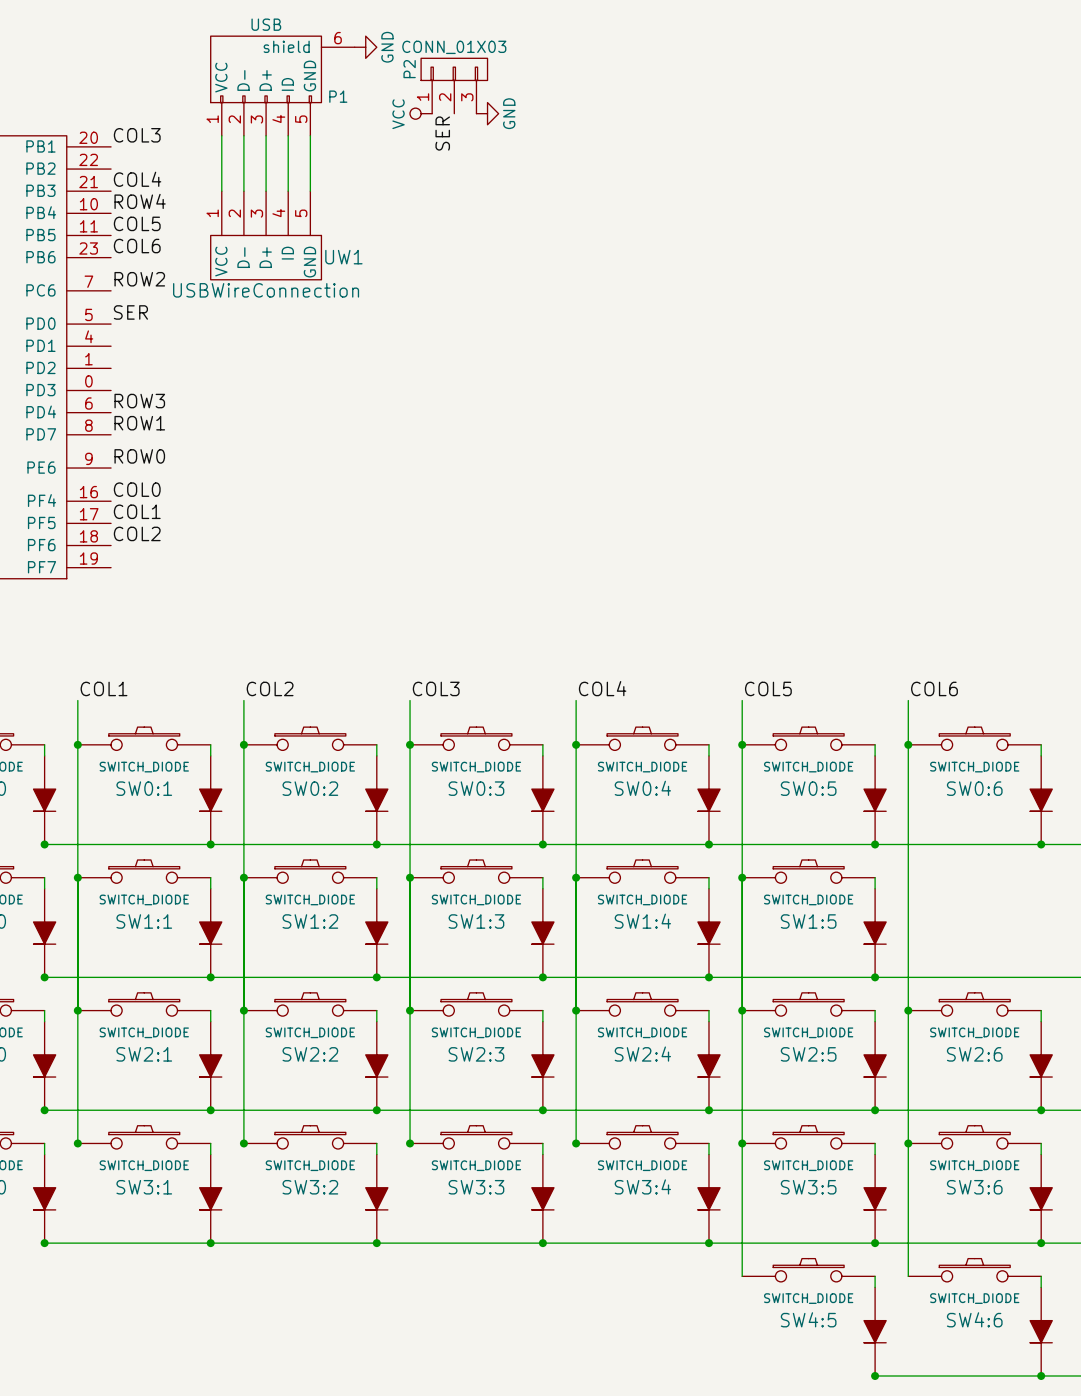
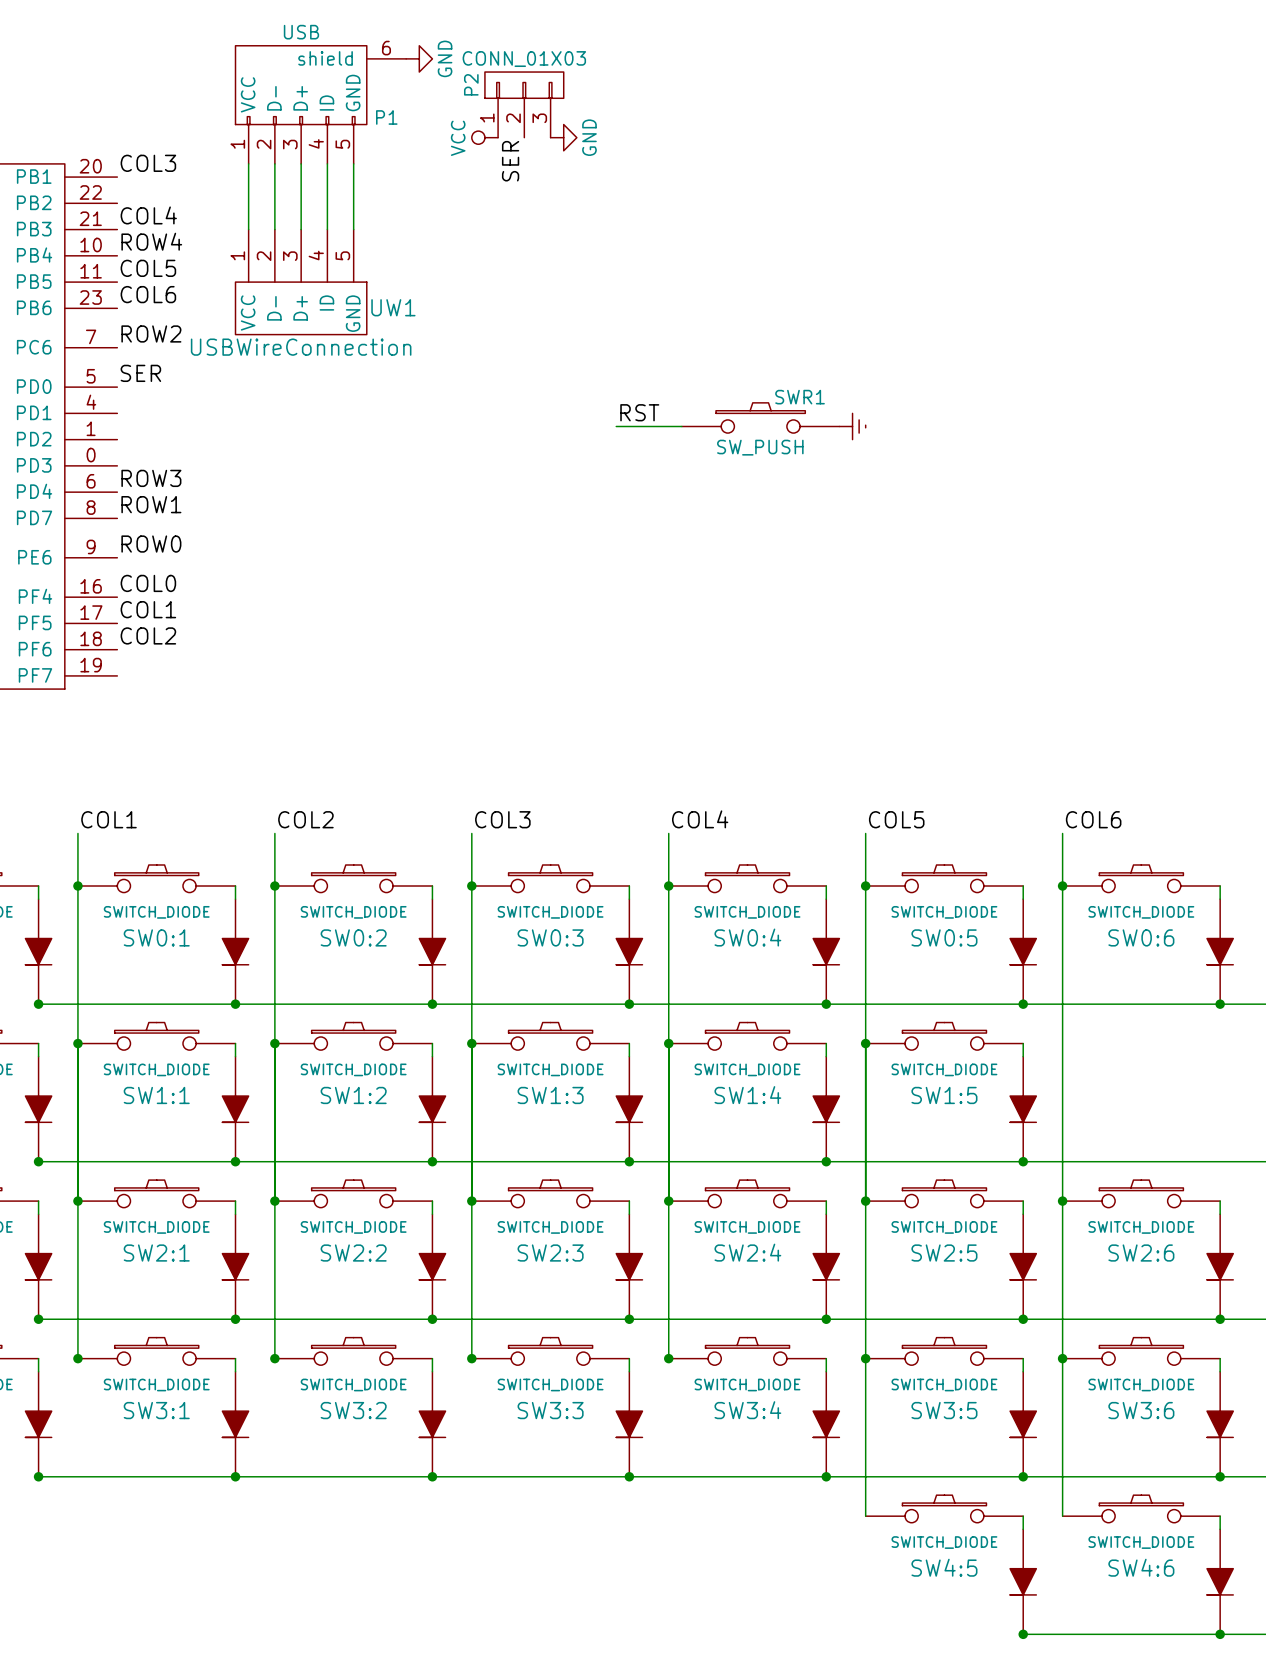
label: none -> RST (639, 412)
SWR1: none -> SW_PUSH (760, 417)
wire: none -> (616, 426) (681, 426)
power symbol: none -> (852, 426)

